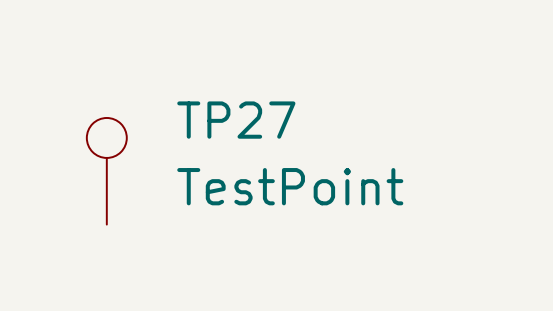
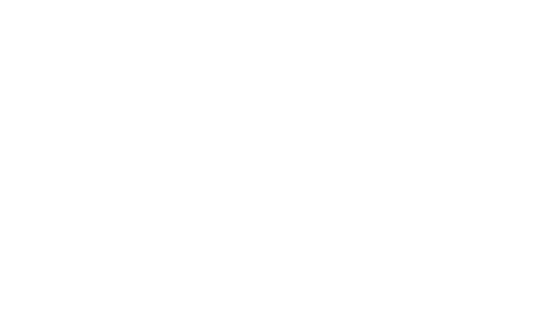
TP27: TestPoint (106, 171) -> none

